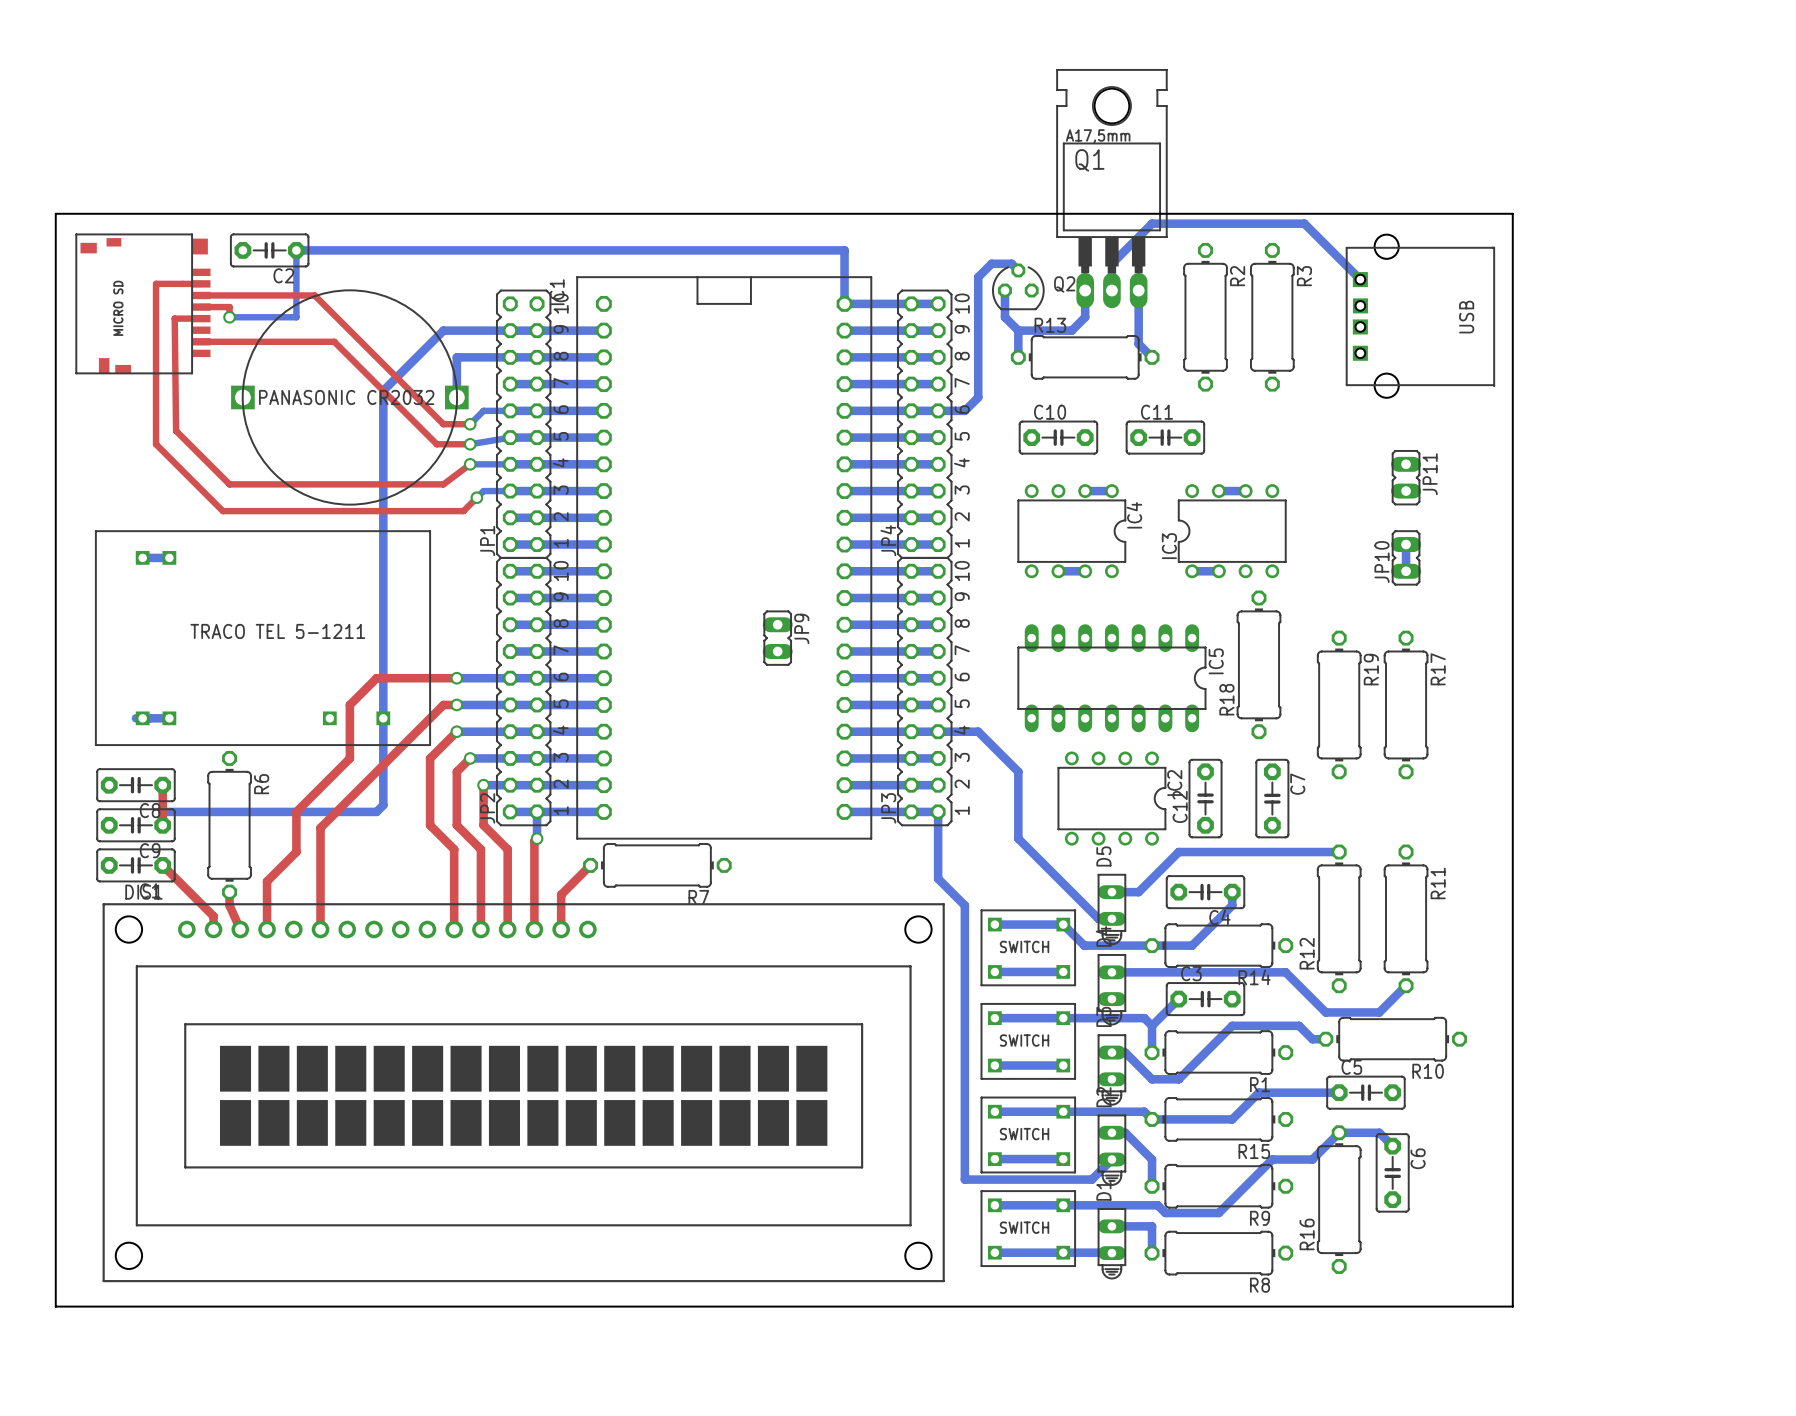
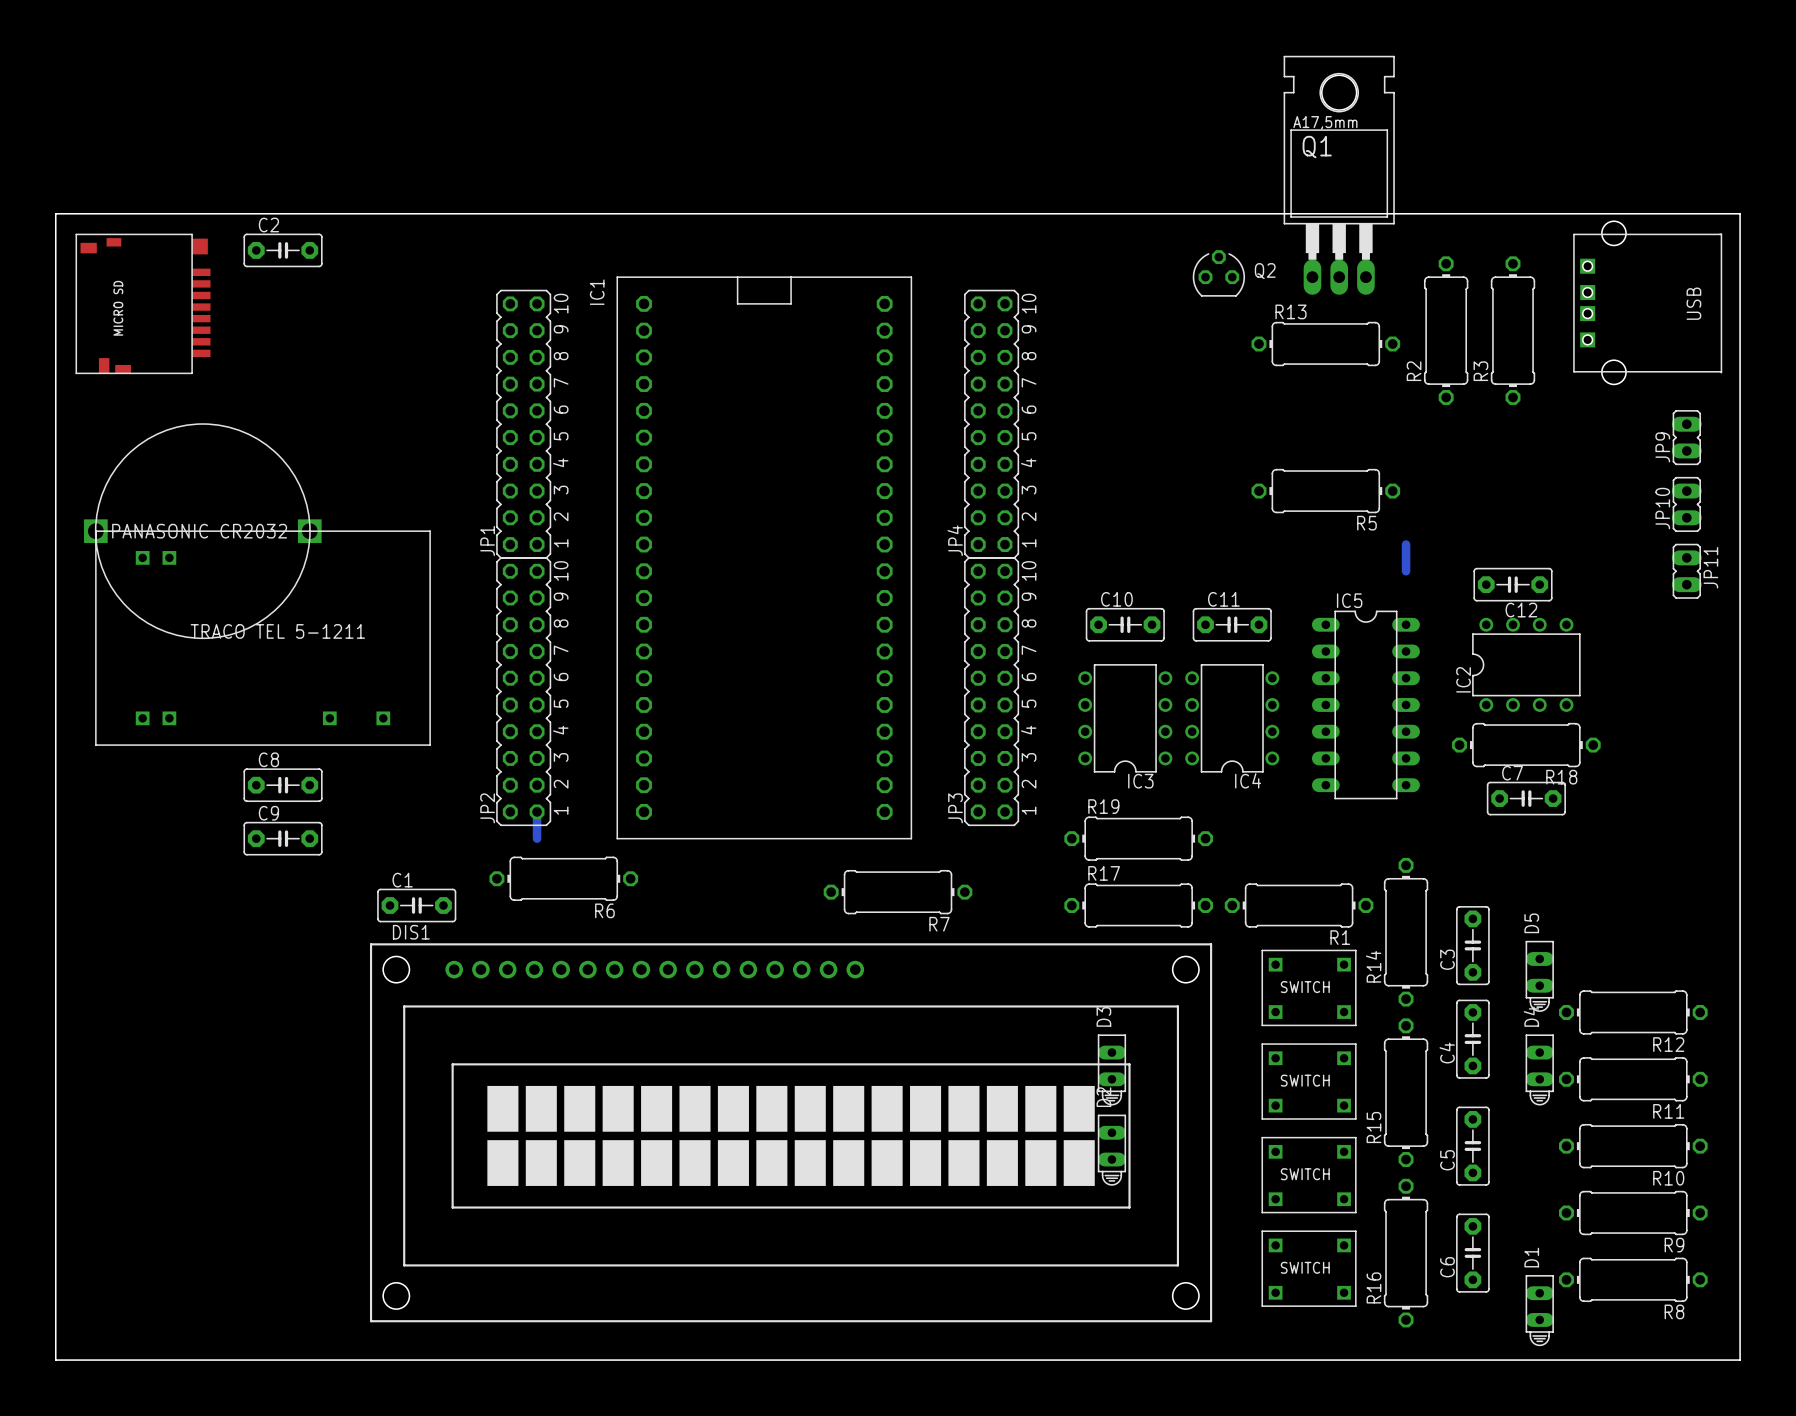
Q1 position: (1111, 188) -> (1339, 175)
board edge: (1512, 213) (1512, 1306) (55, 1306) -> (1512, 213) (1740, 213) (1740, 1360) (55, 1360) (55, 1306)
C2 rotation: 0° (269, 250) -> 180° (283, 250)
bottom track: (1018, 270) (1011, 263) (991, 263) (978, 277) (978, 397) (964, 410) (844, 410) -> none
R2 name position: R2 (1237, 276) -> R2 (1414, 371)
R3 name position: R3 (1304, 276) -> R3 (1480, 371)
bottom track: (1360, 279) (1304, 223) (1152, 223) (1111, 263) (1111, 290) -> none
top track: (201, 283) (156, 283) (156, 444) (222, 511) (463, 511) (476, 497) -> none
Q2 position: (1018, 286) -> (1218, 273)
bottom track: (1004, 290) (1004, 317) (1018, 330) -> none
bottom track: (1085, 290) (1085, 317) (1071, 330) (1018, 330) -> none
bottom track: (1138, 290) (1138, 344) (1152, 357) -> none
top track: (201, 295) (314, 295) (443, 424) (470, 424) -> none
bottom track: (938, 303) (844, 303) (844, 250) (296, 250) (296, 317) (229, 317) -> none
top track: (201, 307) (229, 307) (229, 317) -> none
part position: (1420, 316) -> (1647, 302)
via: (229, 317) -> none
R2 position: (1205, 317) -> (1446, 330)
R3 position: (1272, 317) -> (1513, 330)
top track: (201, 318) (174, 318) (176, 430) (229, 484) (443, 484) (470, 464) -> none
bottom track: (603, 330) (443, 330) (383, 390) (383, 805) (376, 811) (162, 811) (162, 825) -> none
bottom track: (844, 330) (938, 330) -> none
bottom track: (1018, 330) (1018, 357) -> none
top track: (201, 341) (334, 341) (436, 444) (470, 444) -> none
bottom track: (603, 357) (456, 357) (456, 397) -> none
bottom track: (844, 357) (938, 357) -> none
R13 position: (1085, 357) -> (1325, 344)
bottom track: (510, 384) (603, 384) -> none
bottom track: (844, 384) (938, 384) -> none
part position: (349, 397) -> (202, 531)
bottom track: (603, 410) (483, 410) (470, 424) -> none
via: (470, 424) -> none
JP4 position: (924, 424) -> (991, 424)
bottom track: (603, 437) (510, 437) (470, 444) -> none
bottom track: (844, 437) (938, 437) -> none
C10 position: (1058, 437) -> (1125, 624)
C11 position: (1165, 437) -> (1232, 624)
via: (470, 444) -> none
bottom track: (470, 464) (603, 464) -> none
via: (470, 464) -> none
bottom track: (844, 464) (938, 464) -> none
JP11 position: (1406, 477) -> (1686, 571)
bottom track: (603, 491) (483, 491) (476, 497) -> none
bottom track: (844, 491) (938, 491) -> none
bottom track: (1085, 491) (1111, 491) -> none
bottom track: (1218, 491) (1245, 491) -> none
R5: none -> (1325, 491)
via: (476, 497) -> none
bottom track: (510, 517) (603, 517) -> none
bottom track: (844, 517) (938, 517) -> none
IC4 rotation: 0° (1071, 531) -> 90° clockwise (1232, 718)
IC4 position: (1071, 531) -> (1232, 718)
IC3 rotation: 0° (1232, 531) -> 90° counterclockwise (1125, 718)
IC3 position: (1232, 531) -> (1125, 718)
bottom track: (510, 544) (603, 544) -> none
bottom track: (844, 544) (938, 544) -> none
bottom track: (142, 557) (169, 557) -> none
IC1 position: (724, 557) -> (764, 557)
JP10 position: (1406, 557) -> (1686, 504)
bottom track: (510, 571) (603, 571) -> none
bottom track: (844, 571) (938, 571) -> none
bottom track: (1058, 571) (1085, 571) -> none
bottom track: (1192, 571) (1218, 571) -> none
bottom track: (510, 598) (603, 598) -> none
bottom track: (844, 598) (938, 598) -> none
bottom track: (510, 624) (603, 624) -> none
bottom track: (844, 624) (938, 624) -> none
JP9 name position: JP9 (801, 628) -> JP9 (1662, 447)
JP9 position: (777, 638) -> (1686, 437)
bottom track: (510, 651) (603, 651) -> none
bottom track: (844, 651) (938, 651) -> none
R18 rotation: 0° (1258, 664) -> 90° clockwise (1526, 745)
R18 position: (1258, 664) -> (1526, 745)
R19 name position: R19 (1371, 669) -> R19 (1103, 806)
R17 name position: R17 (1438, 669) -> R17 (1104, 873)
bottom track: (456, 678) (603, 678) -> none
top track: (456, 678) (376, 678) (349, 704) (349, 758) (296, 811) (296, 852) (267, 881) (267, 929) -> none
via: (456, 678) -> none
bottom track: (844, 678) (938, 678) -> none
IC5 rotation: 0° (1111, 678) -> 90° counterclockwise (1365, 704)
IC5 position: (1111, 678) -> (1365, 704)
JP3 position: (924, 691) -> (991, 691)
R18 name position: R18 (1226, 699) -> R18 (1561, 777)
bottom track: (456, 704) (603, 704) -> none
top track: (456, 704) (443, 704) (320, 827) (320, 929) -> none
via: (456, 704) -> none
bottom track: (844, 704) (938, 704) -> none
R19 rotation: 0° (1339, 704) -> 90° clockwise (1138, 838)
R19 position: (1339, 704) -> (1138, 838)
R17 rotation: 0° (1406, 704) -> 90° clockwise (1138, 905)
R17 position: (1406, 704) -> (1138, 905)
bottom track: (135, 718) (169, 718) -> none
bottom track: (456, 731) (603, 731) -> none
top track: (456, 731) (430, 758) (430, 825) (454, 849) (454, 929) -> none
via: (456, 731) -> none
bottom track: (844, 731) (978, 731) (1018, 771) (1018, 838) (1098, 918) (1111, 918) -> none
bottom track: (470, 758) (603, 758) -> none
top track: (470, 758) (456, 771) (456, 825) (480, 849) (480, 929) -> none
via: (470, 758) -> none
bottom track: (844, 758) (938, 758) -> none
C8 rotation: 0° (135, 785) -> 180° (283, 785)
C8 position: (135, 785) -> (283, 785)
top track: (162, 785) (162, 825) -> none
bottom track: (483, 785) (603, 785) -> none
top track: (483, 785) (483, 825) (507, 849) (507, 929) -> none
via: (483, 785) -> none
bottom track: (844, 785) (938, 785) -> none
IC2 rotation: 0° (1111, 798) -> 180° (1526, 664)
IC2 position: (1111, 798) -> (1526, 664)
C12 rotation: 0° (1205, 798) -> 90° counterclockwise (1513, 584)
C12 position: (1205, 798) -> (1513, 584)
C7 rotation: 0° (1272, 798) -> 90° counterclockwise (1526, 798)
C7 position: (1272, 798) -> (1526, 798)
bottom track: (510, 811) (603, 811) -> none
bottom track: (844, 811) (938, 811) (938, 878) (964, 905) (964, 1179) (1091, 1179) (1111, 1159) -> none
C9 rotation: 0° (135, 825) -> 180° (283, 838)
C9 position: (135, 825) -> (283, 838)
R6 rotation: 0° (229, 825) -> 90° clockwise (563, 878)
R6 position: (229, 825) -> (563, 878)
top track: (537, 838) (534, 841) (534, 929) -> none
via: (537, 838) -> none
bottom track: (1339, 852) (1178, 852) (1138, 892) (1111, 892) -> none
C1 rotation: 0° (135, 865) -> 180° (416, 905)
C1 position: (135, 865) -> (416, 905)
top track: (162, 865) (213, 916) (213, 929) -> none
top track: (590, 865) (561, 894) (561, 929) -> none
R7 position: (657, 865) -> (898, 892)
top track: (229, 892) (229, 905) (240, 929) -> none
C4 rotation: 0° (1205, 892) -> 90° clockwise (1472, 1039)
C4 position: (1205, 892) -> (1472, 1039)
bottom track: (1232, 892) (1232, 905) (1192, 945) (1084, 945) (1063, 924) -> none
D5 position: (1111, 909) -> (1539, 976)
R12 rotation: 0° (1339, 918) -> 90° clockwise (1633, 1012)
R12 position: (1339, 918) -> (1633, 1012)
R11 rotation: 0° (1406, 918) -> 90° clockwise (1633, 1079)
R11 position: (1406, 918) -> (1633, 1079)
bottom track: (994, 924) (1065, 925) -> none
R14 rotation: 0° (1218, 945) -> 90° clockwise (1406, 932)
R14 position: (1218, 945) -> (1406, 932)
part: (1028, 947) -> none
R12 name position: R12 (1307, 953) -> R12 (1668, 1044)
bottom track: (994, 971) (1063, 971) -> none
bottom track: (1111, 972) (1285, 972) (1325, 1012) (1379, 1012) (1406, 985) -> none
part: none -> (1309, 987)
D4 position: (1111, 989) -> (1539, 1069)
bottom track: (1178, 999) (1152, 1025) -> none
C3 rotation: 0° (1205, 999) -> 90° counterclockwise (1472, 945)
C3 position: (1205, 999) -> (1472, 945)
bottom track: (994, 1018) (1144, 1018) (1152, 1025) -> none
bottom track: (1152, 1025) (1152, 1052) -> none
bottom track: (1325, 1039) (1312, 1039) (1299, 1025) (1232, 1025) (1178, 1079) (1152, 1079) (1125, 1052) (1111, 1052) -> none
R10 position: (1392, 1039) -> (1633, 1146)
part: (1028, 1041) -> none
R1 position: (1218, 1052) -> (1299, 905)
bottom track: (994, 1065) (1063, 1065) -> none
part: none -> (1309, 1081)
DIS1 position: (523, 1092) -> (791, 1132)
bottom track: (1339, 1092) (1258, 1092) (1232, 1119) (1152, 1119) (1144, 1111) (994, 1111) -> none
C5 rotation: 0° (1365, 1092) -> 90° counterclockwise (1472, 1146)
C5 position: (1365, 1092) -> (1472, 1146)
R15 rotation: 0° (1218, 1119) -> 90° clockwise (1406, 1092)
R15 position: (1218, 1119) -> (1406, 1092)
bottom track: (1111, 1132) (1125, 1132) (1152, 1159) (1152, 1186) -> none
part: (1028, 1134) -> none
bottom track: (1392, 1146) (1379, 1132) (1339, 1132) (1312, 1159) (1272, 1159) (1218, 1213) (1165, 1213) (1157, 1205) (994, 1205) -> none
bottom track: (994, 1159) (1063, 1159) -> none
C6 rotation: 0° (1392, 1172) -> 180° (1472, 1253)
C6 position: (1392, 1172) -> (1472, 1253)
part: none -> (1309, 1175)
R9 position: (1218, 1186) -> (1633, 1213)
R16 position: (1339, 1199) -> (1406, 1253)
bottom track: (1111, 1226) (1152, 1226) (1152, 1253) -> none
part: (1028, 1228) -> none
D1 position: (1111, 1243) -> (1539, 1310)
bottom track: (994, 1252) (1111, 1253) -> none
R8 position: (1218, 1253) -> (1633, 1279)
part: none -> (1309, 1268)

